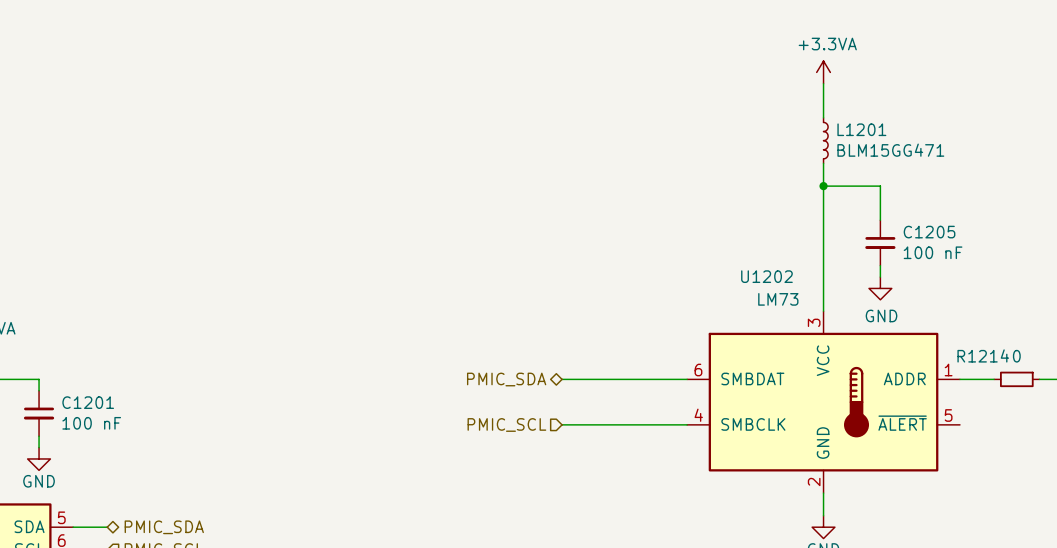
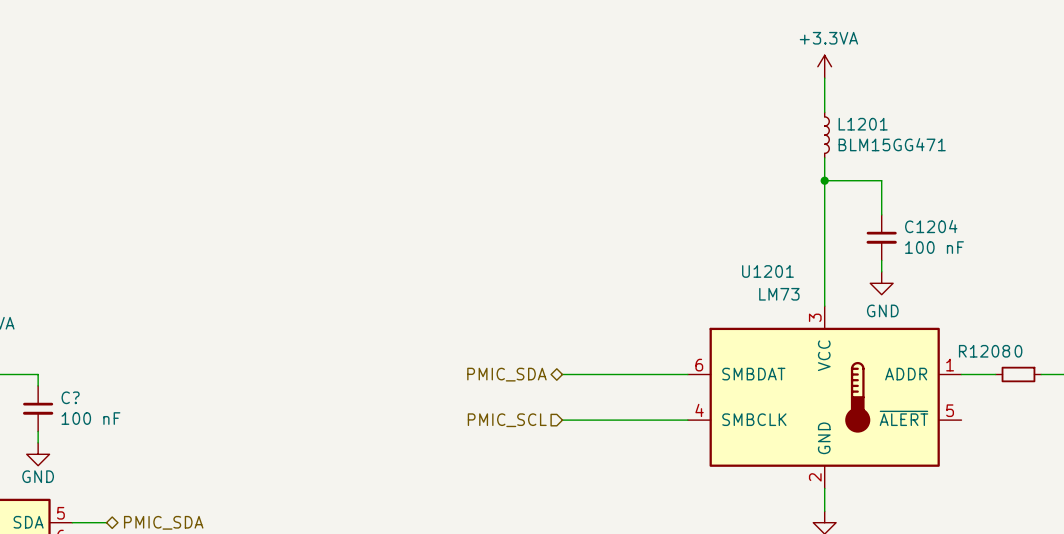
C1205 name: C1205 (929, 232) -> C1204 (931, 226)
U1202 name: U1202 (766, 276) -> U1201 (767, 271)
R1214 name: R1214 (983, 355) -> R1208 (984, 351)
C1201 name: C1201 (88, 402) -> C? (70, 397)

